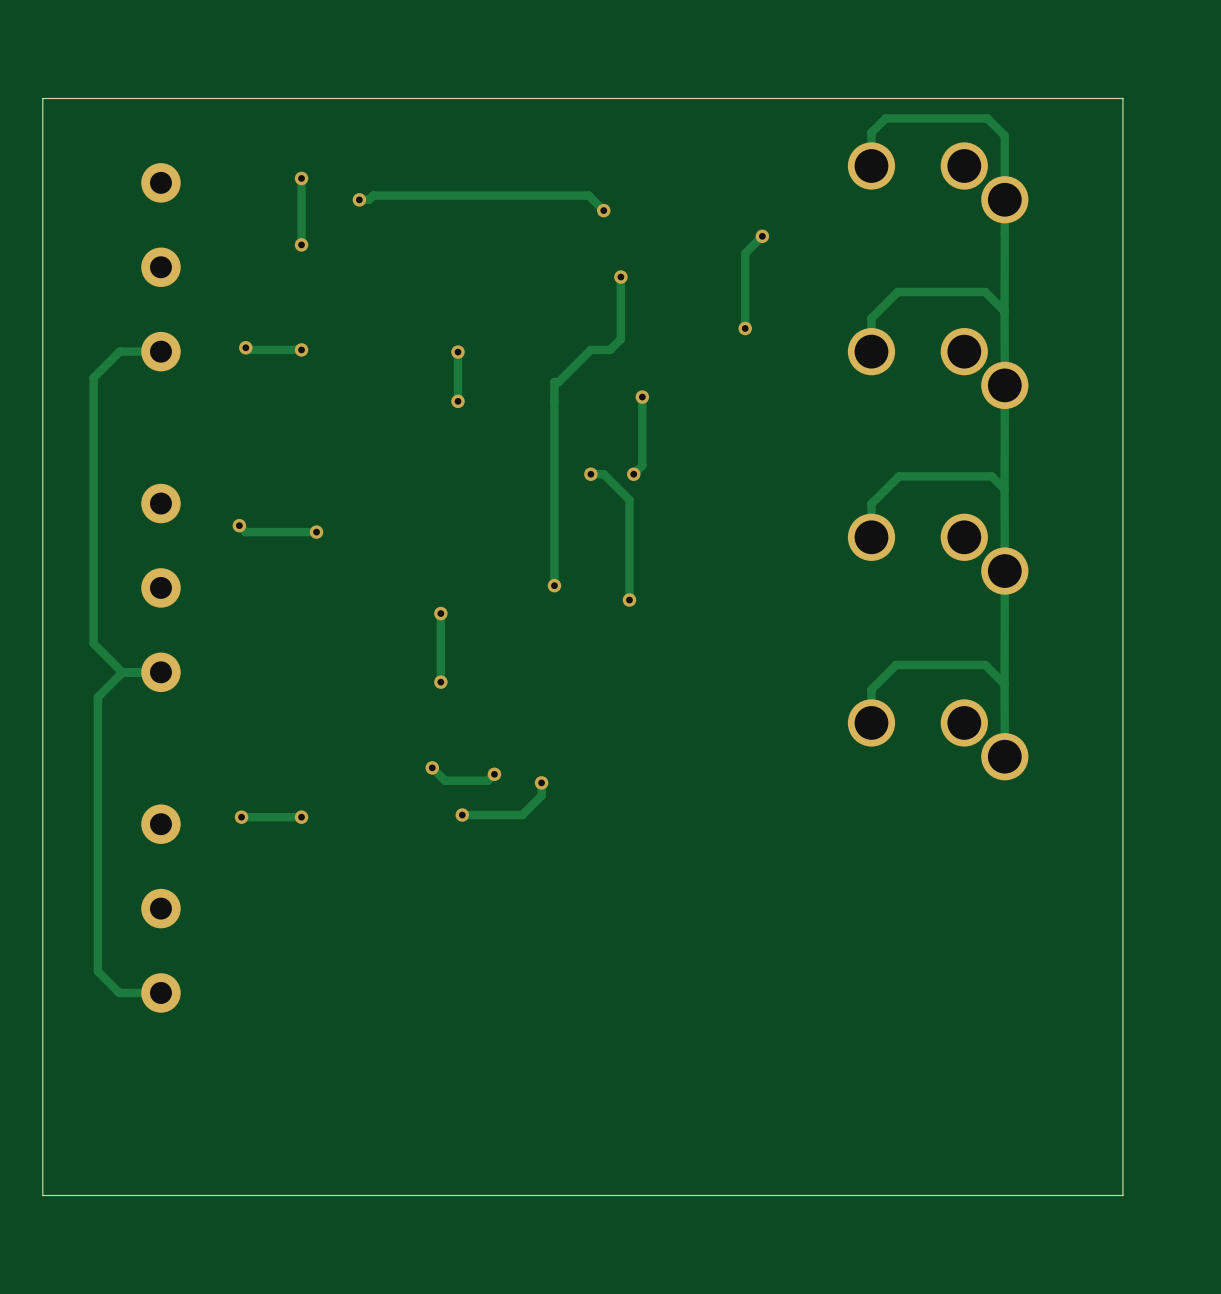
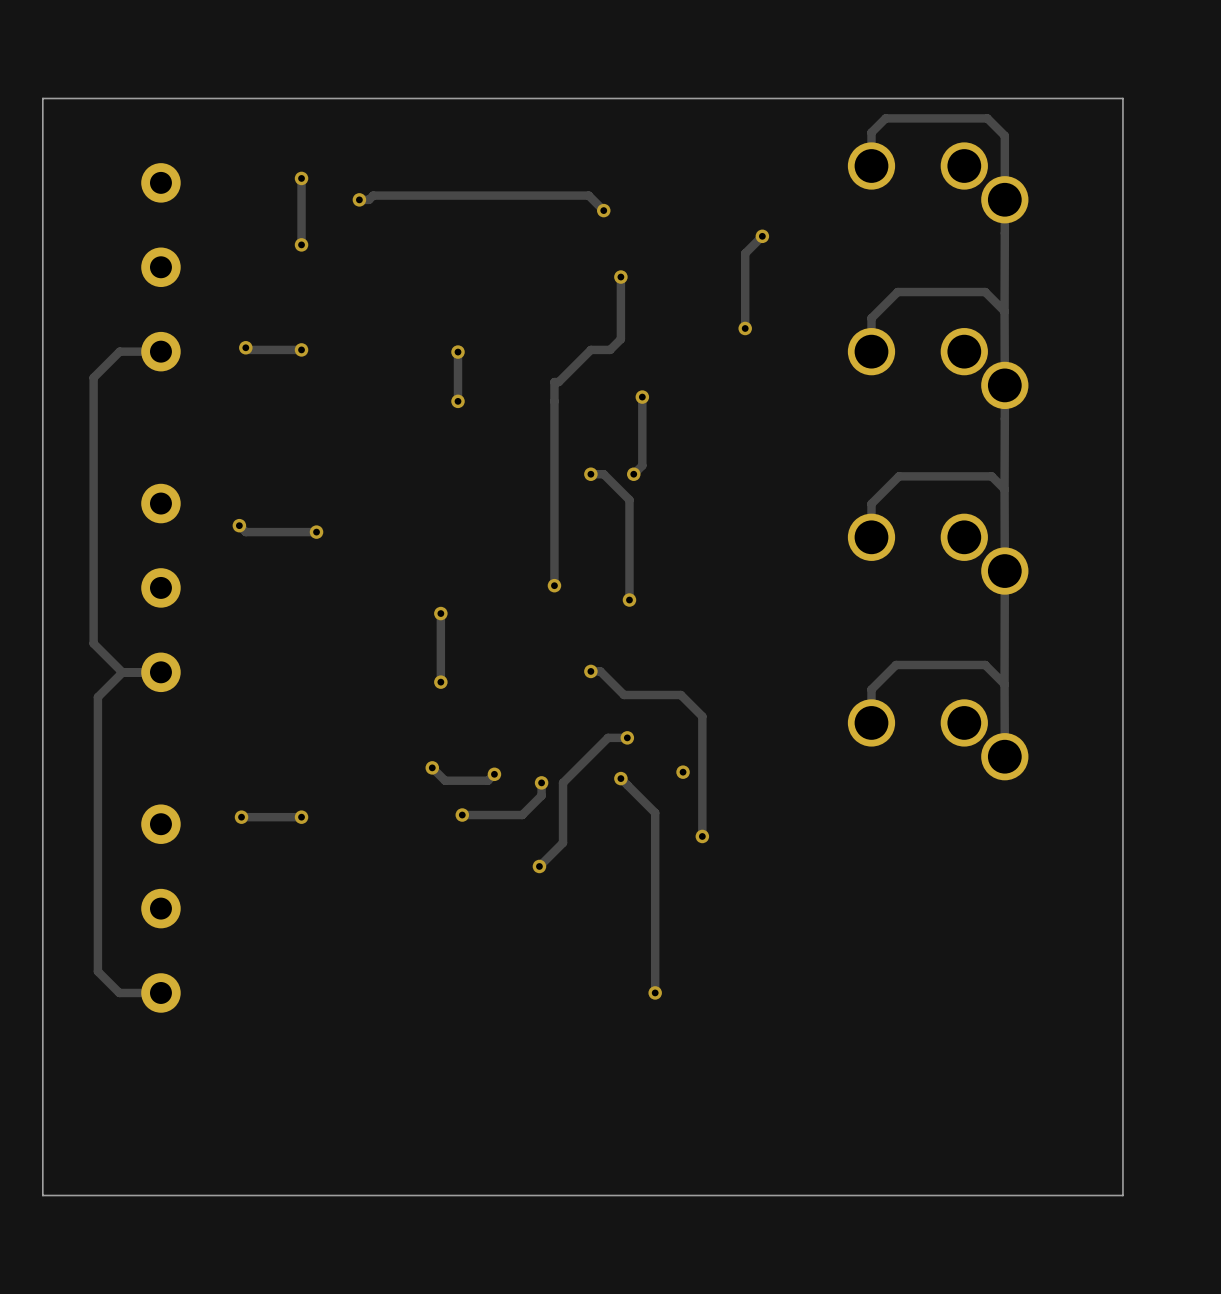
track: none -> (590, 671) (600, 671) (624, 695) (680, 695) (702, 716) (702, 836)
via: none -> (590, 671)
track: none -> (627, 737) (608, 737) (563, 782) (563, 842) (539, 866)
via: none -> (627, 737)
via: none -> (683, 772)
track: none -> (620, 778) (655, 812) (655, 992)
via: none -> (620, 778)
via: none -> (702, 836)
via: none -> (539, 866)
via: none -> (655, 992)

